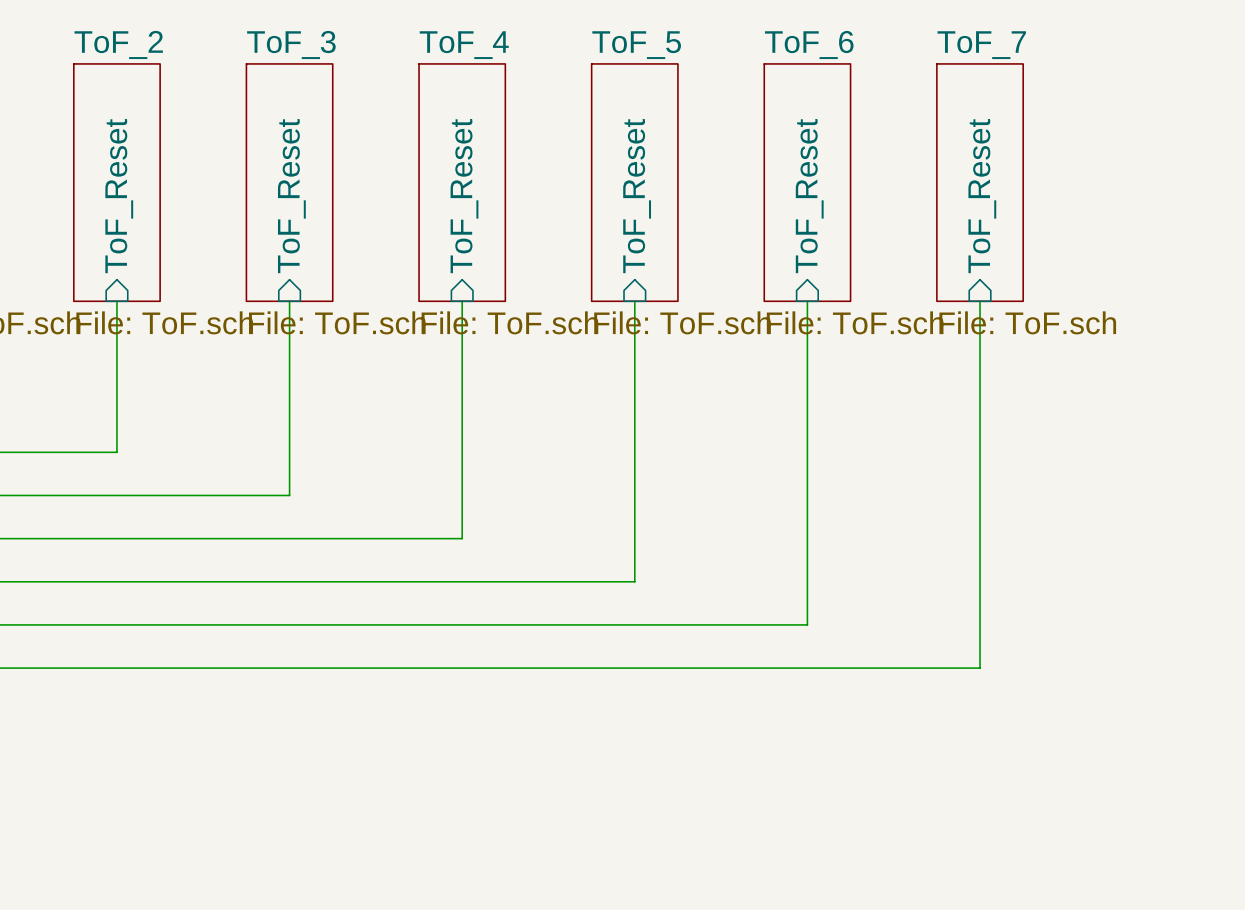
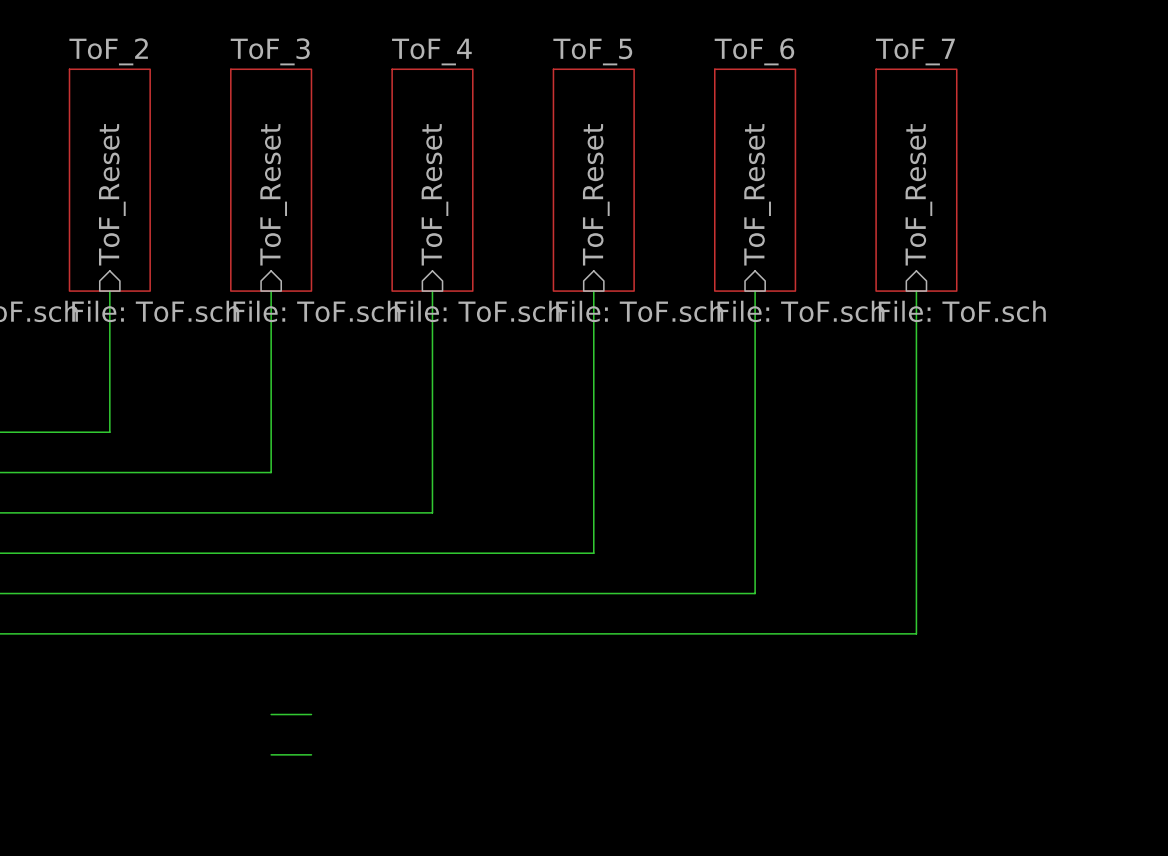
wire: none -> (271, 714) (311, 714)
wire: none -> (271, 754) (311, 754)

